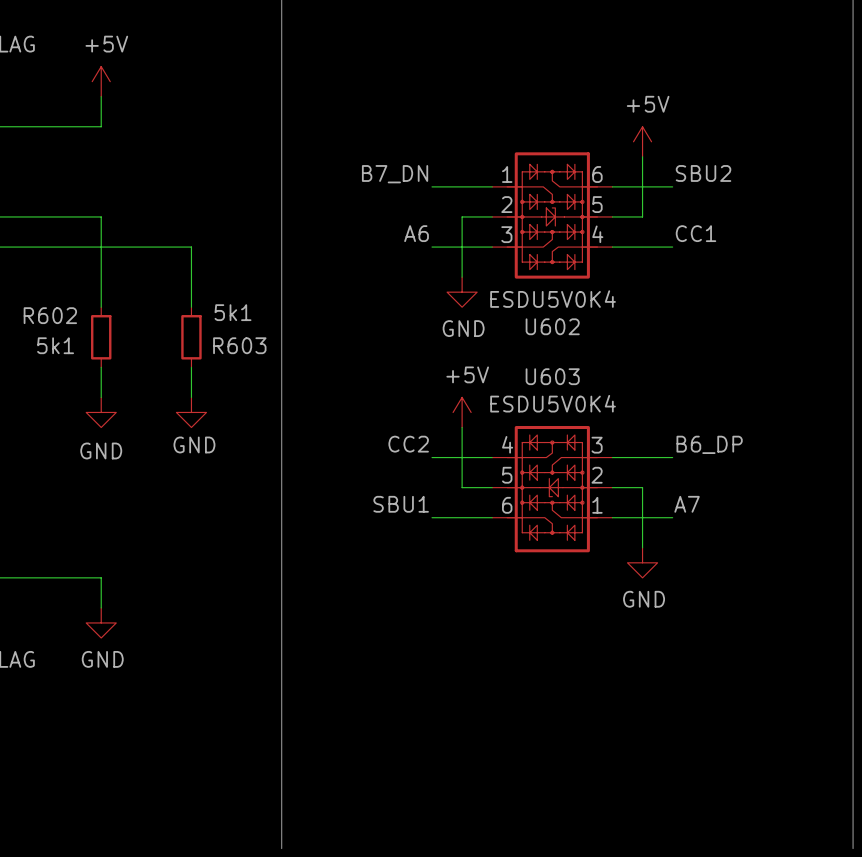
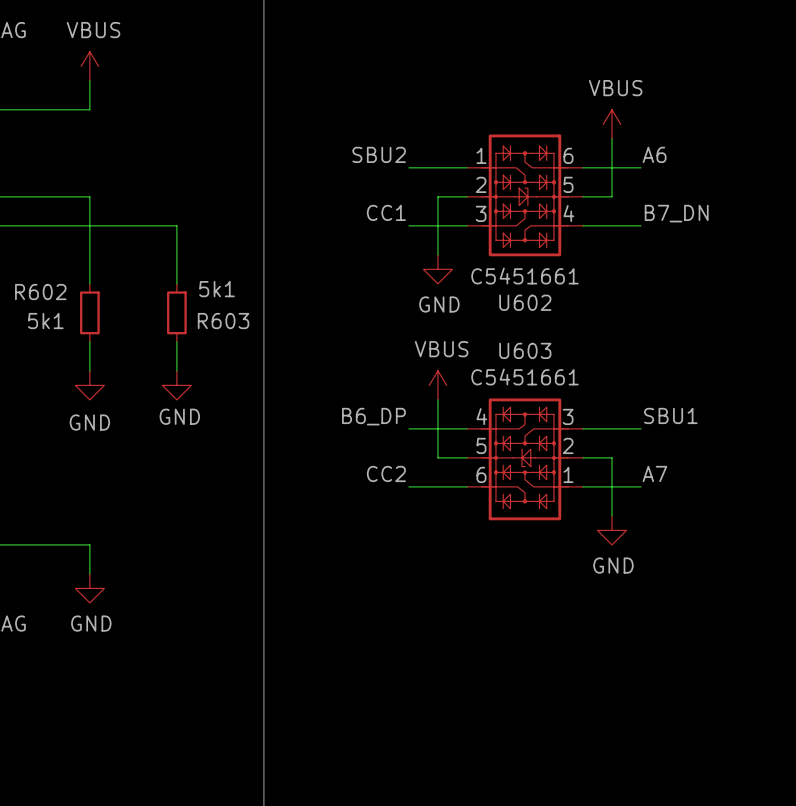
power symbol: +5V (101, 81) -> VBUS (89, 66)
power symbol: +5V (642, 141) -> VBUS (612, 124)
label: SBU2 (703, 173) -> A6 (654, 154)
label: B7_DN (395, 174) -> SBU2 (379, 154)
label: A6 (416, 233) -> CC1 (386, 212)
label: CC1 (696, 233) -> B7_DN (676, 213)
U602 value: ESDU5V0K4 (553, 299) -> C5451661 (524, 276)
U603 value: ESDU5V0K4 (553, 403) -> C5451661 (524, 376)
power symbol: +5V (462, 412) -> VBUS (437, 385)
label: CC2 (408, 444) -> B6_DP (373, 416)
label: B6_DP (709, 444) -> SBU1 (670, 415)
label: SBU1 (401, 504) -> CC2 (386, 473)

